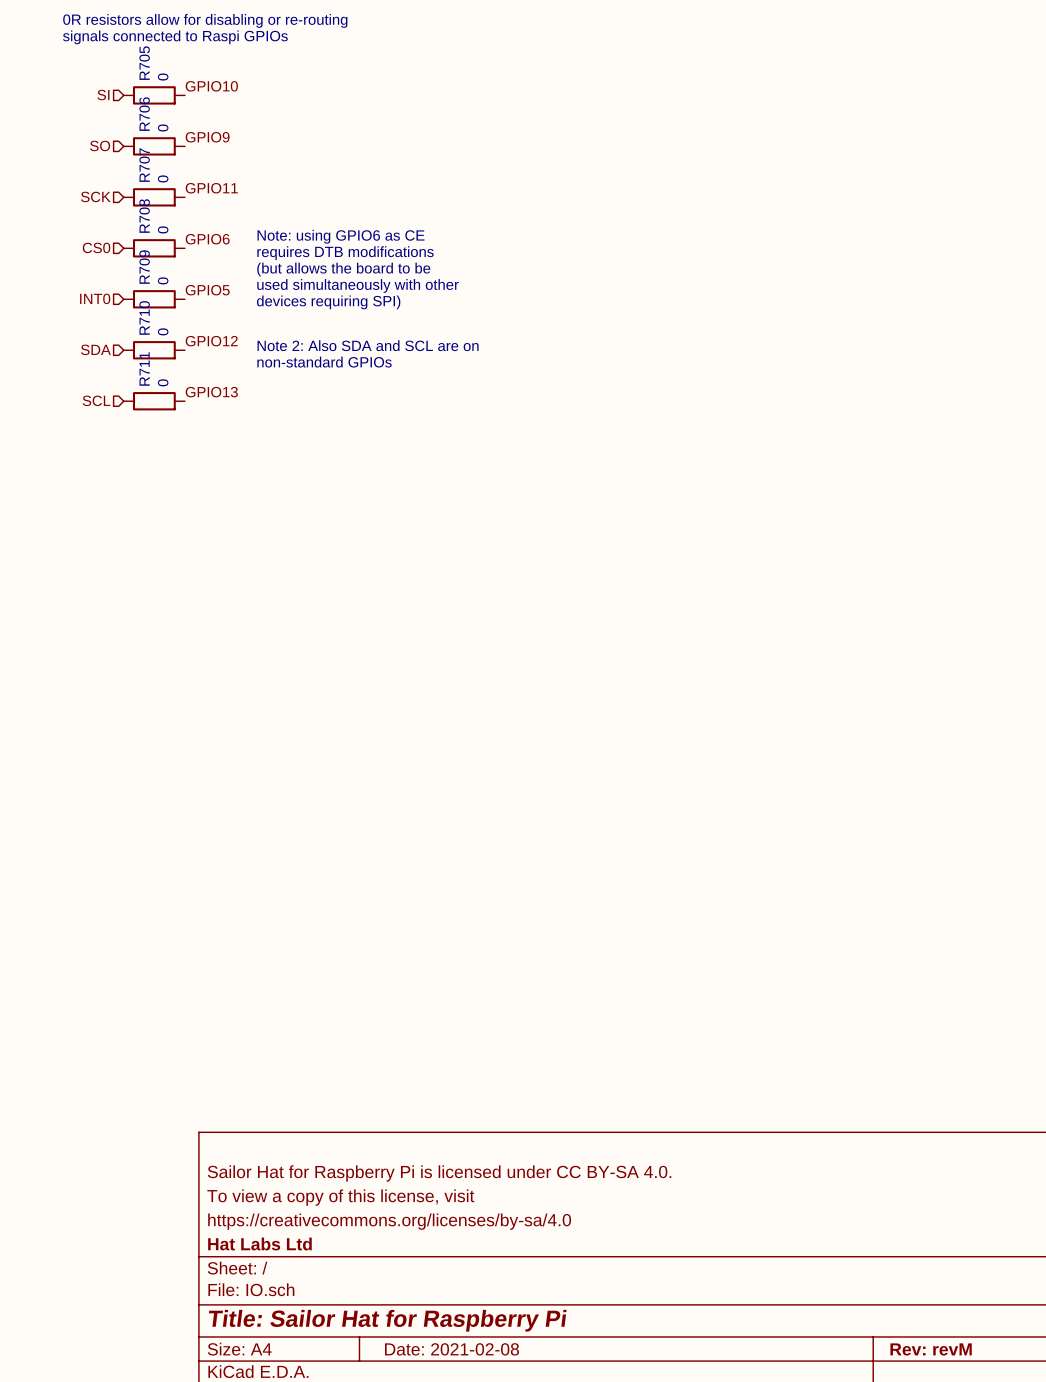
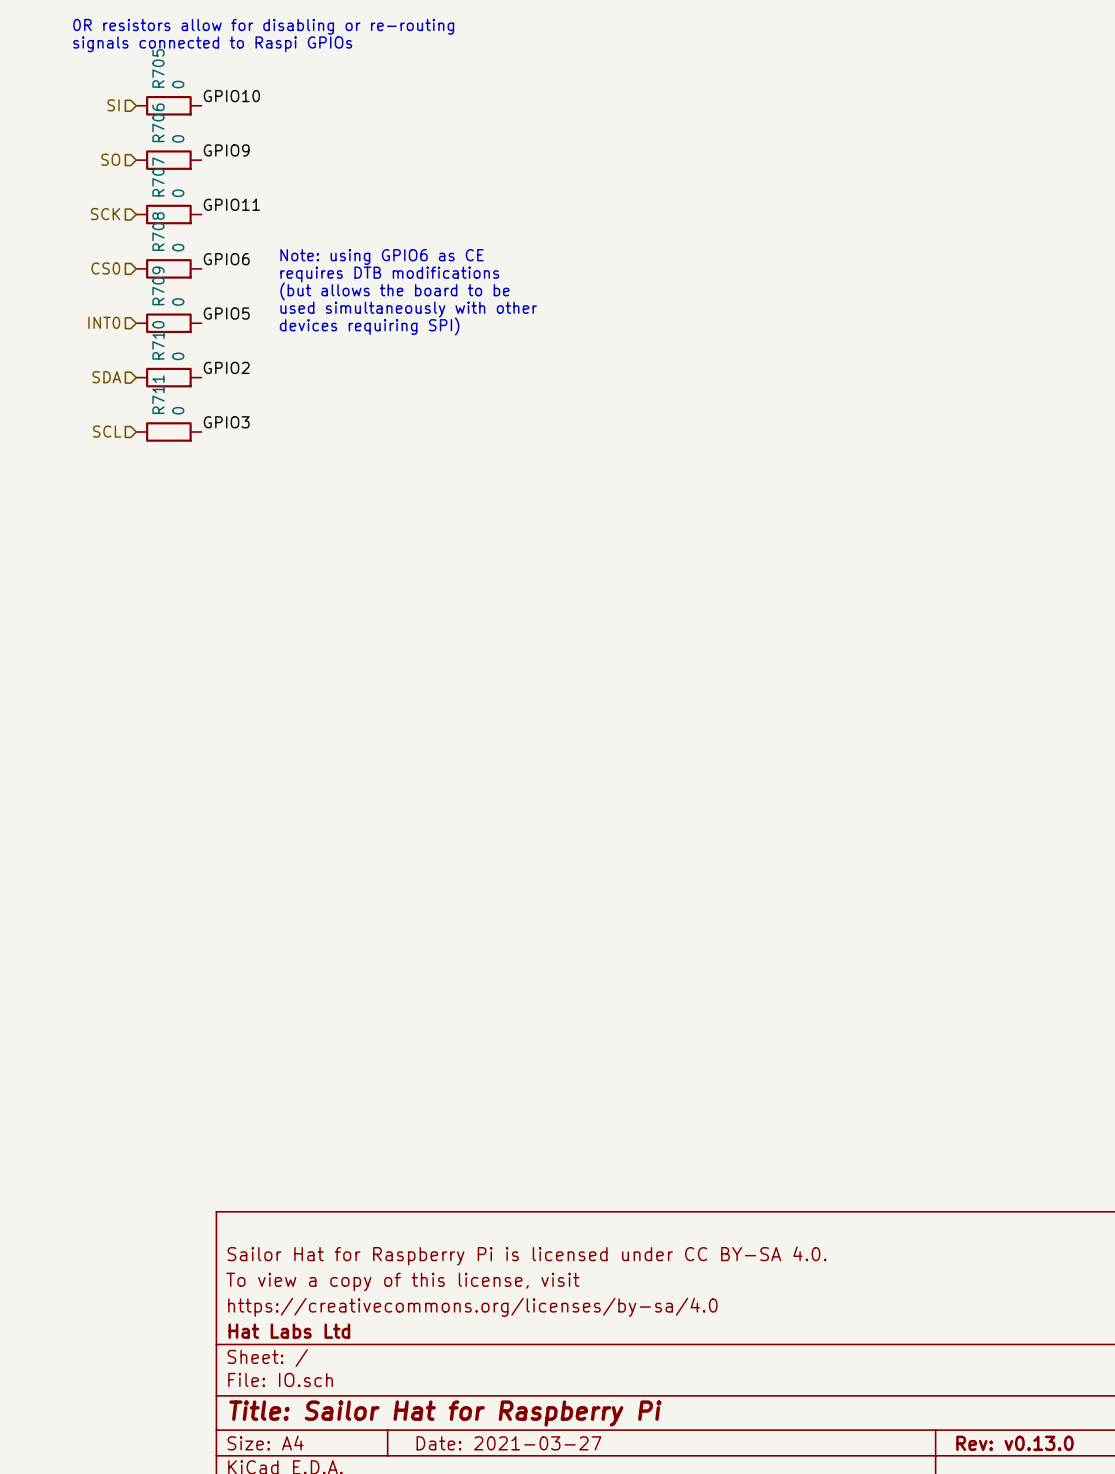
label: GPIO12 (211, 341) -> GPIO2 (226, 367)
text: Note 2: Also SDA and SCL are on (368, 345) -> none
text: non-standard GPIOs (324, 362) -> none
label: GPIO13 (211, 392) -> GPIO3 (226, 422)
title block: Date: 2021-02-08 (452, 1349) -> Date: 2021-03-27 (508, 1443)
title block: Rev: revM (931, 1349) -> Rev: v0.13.0 (1014, 1443)

